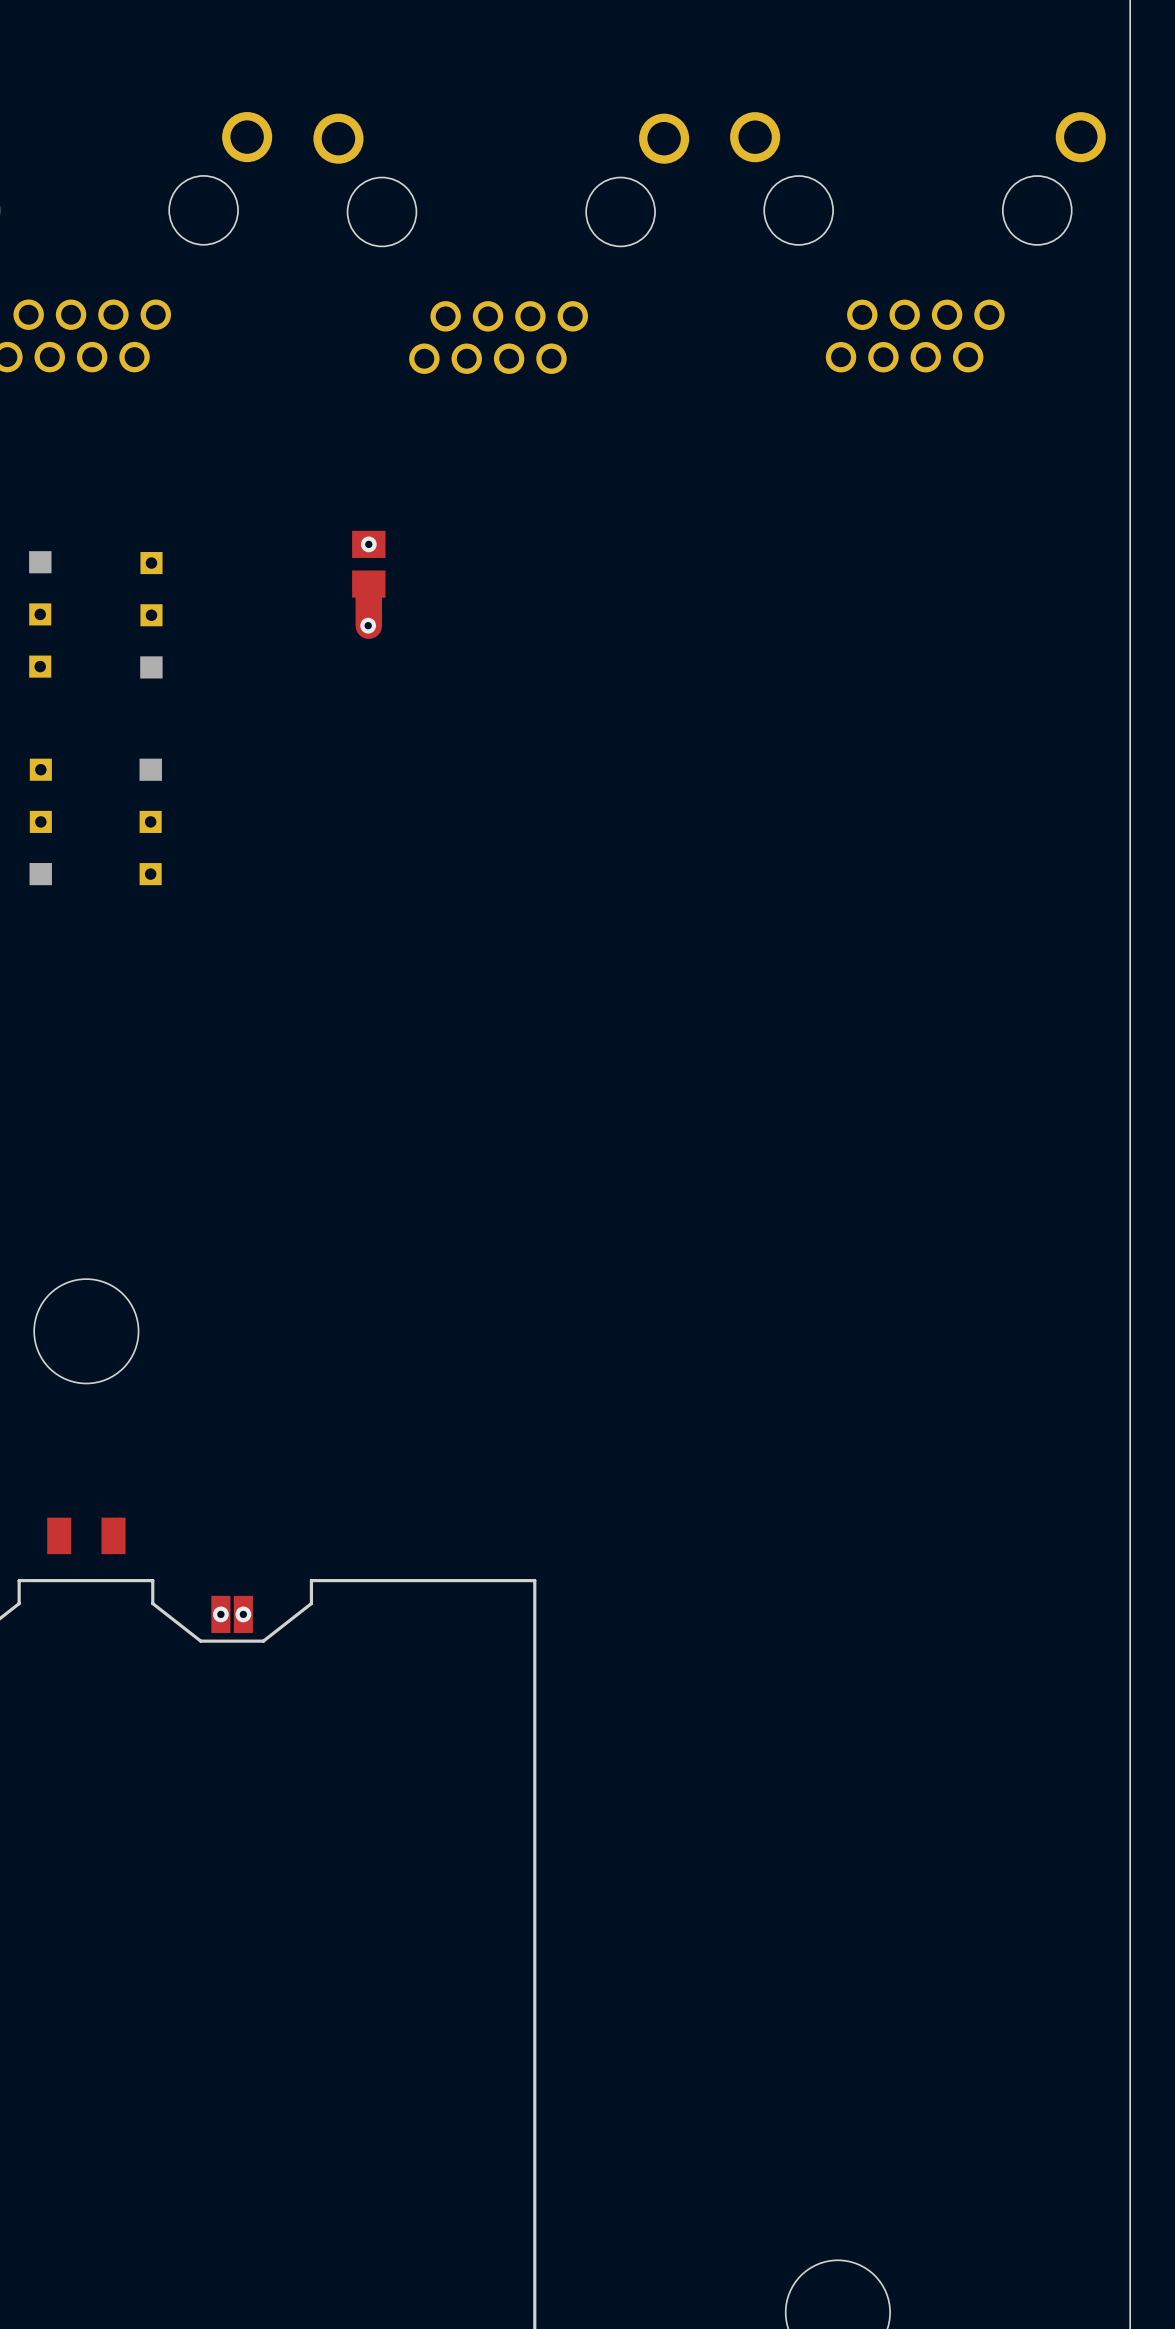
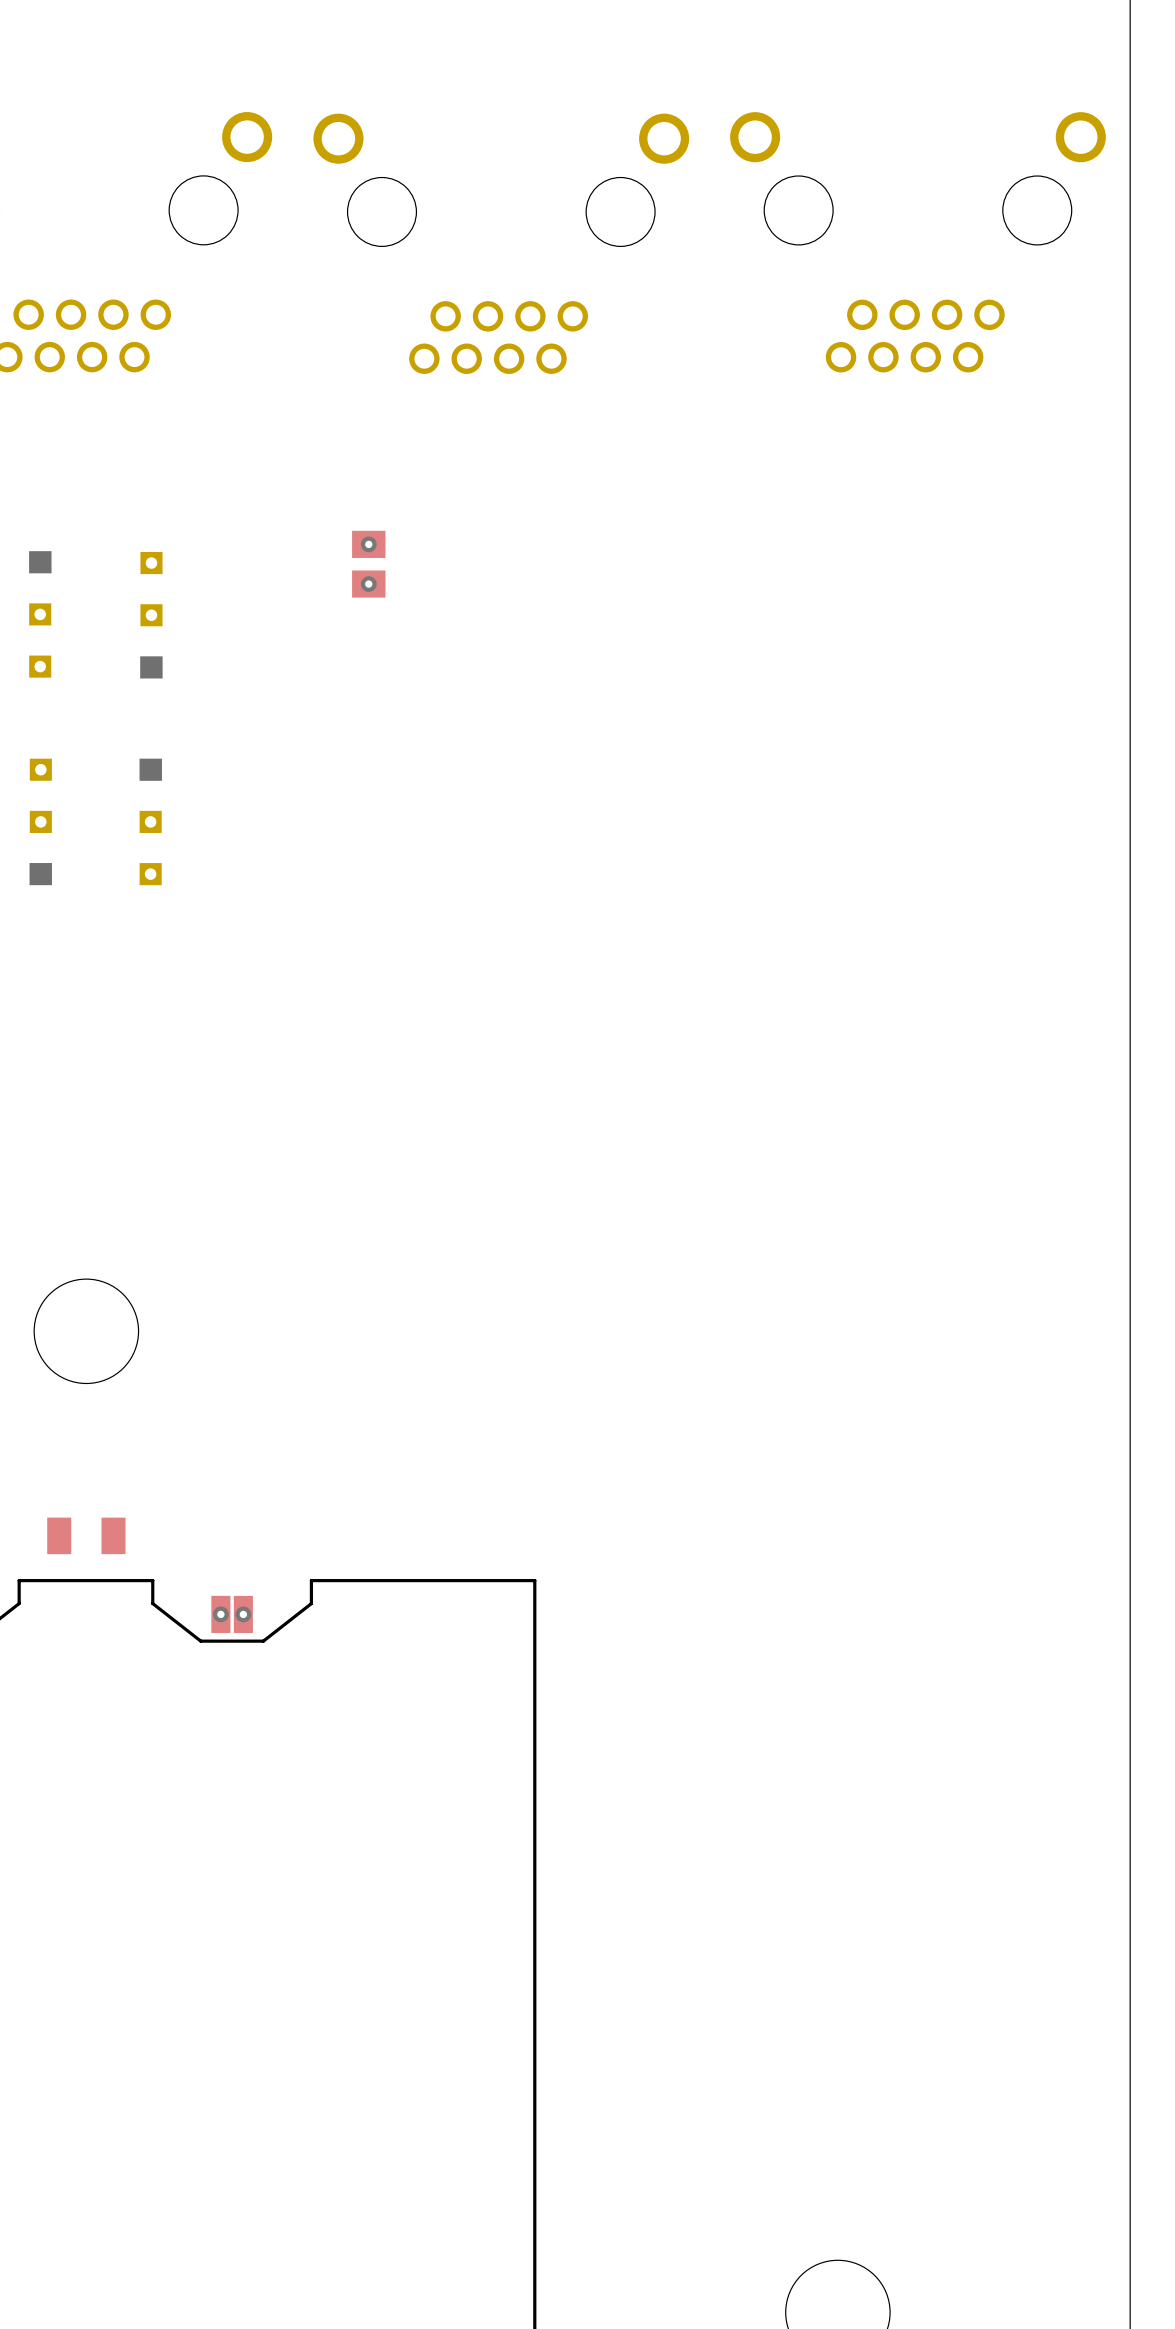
top track: (368, 584) (368, 625) -> none
via position: (368, 625) -> (368, 584)

